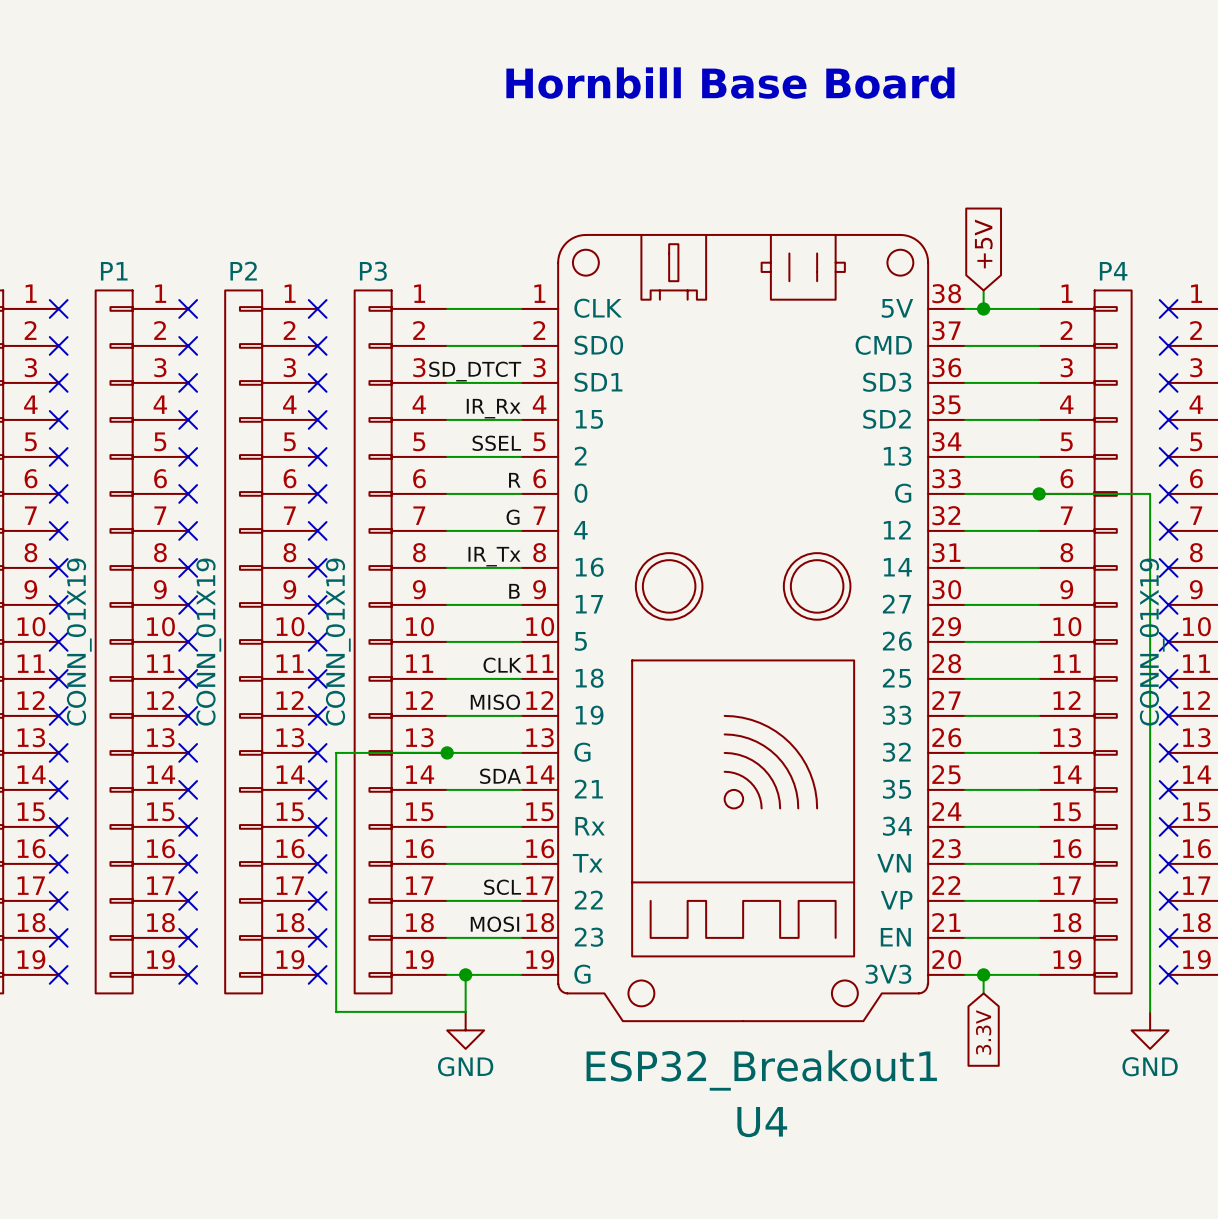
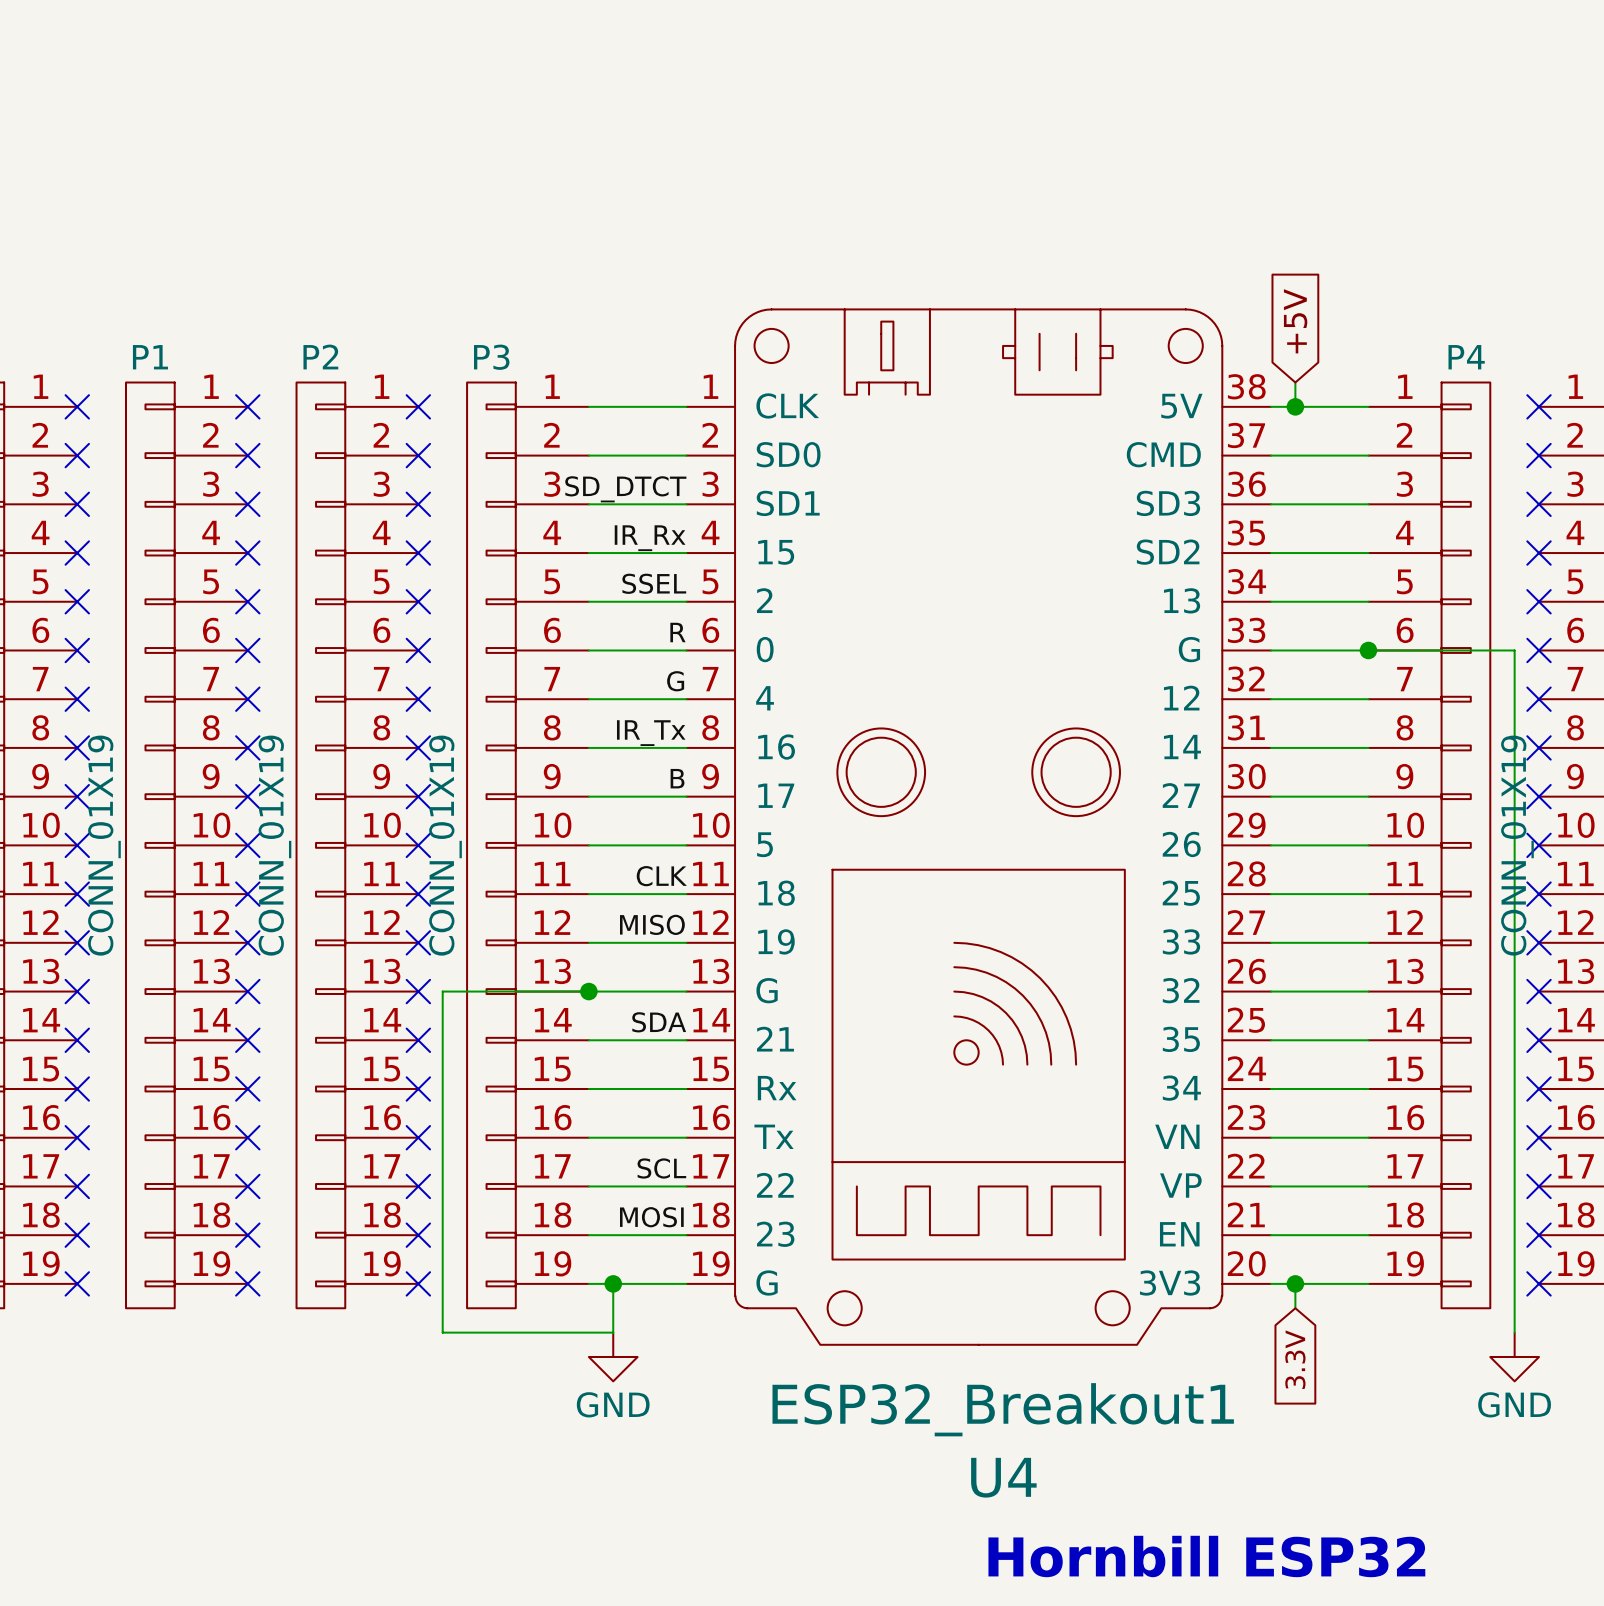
text: Hornbill Base Board (730, 83) -> none
text: none -> Hornbill ESP32 (1206, 1556)

